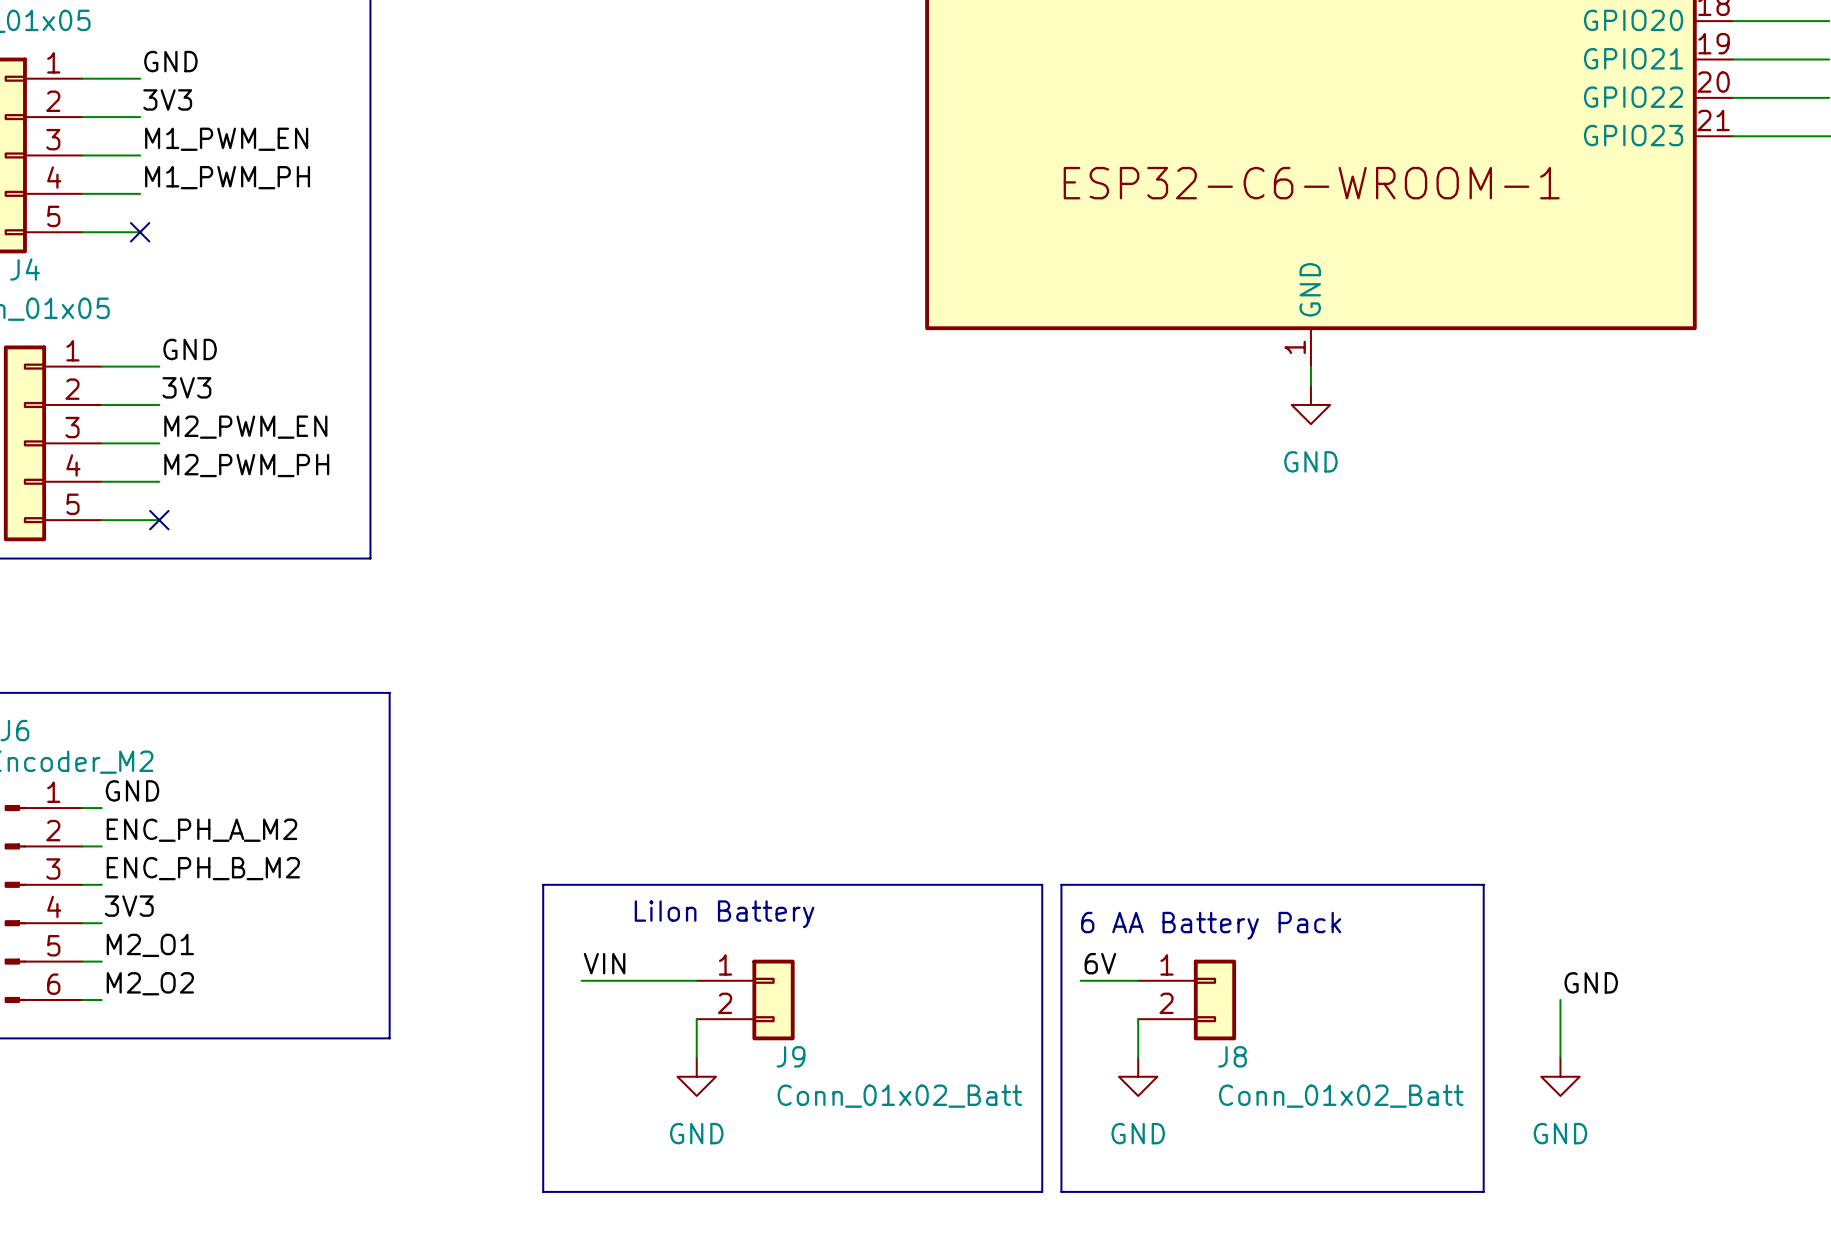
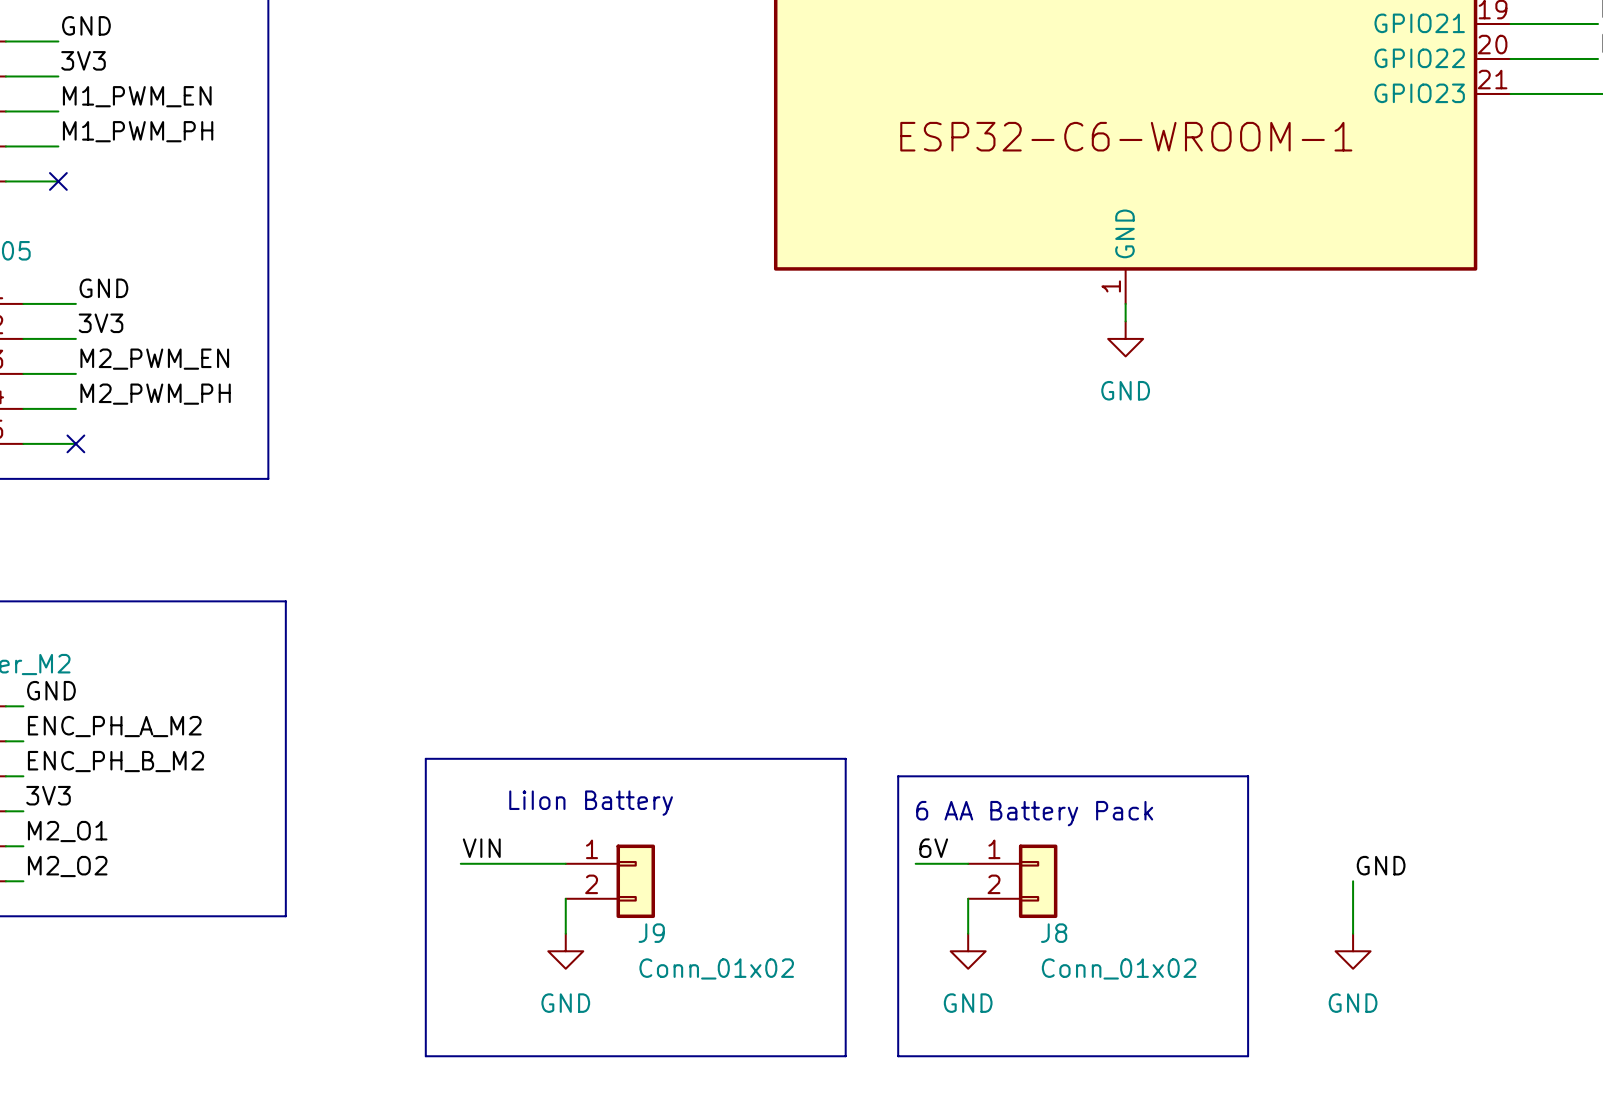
line: (543, 884) (1042, 884) (1042, 1191) (1003, 1191) -> (425, 776) (425, 758) (845, 758) (845, 1056)
line: (1445, 884) (1483, 884) (1483, 1191) (1445, 1191) -> (1248, 776) (1248, 1056)
J9 value: Conn_01x02_Batt (899, 1096) -> Conn_01x02 (716, 968)
J8 value: Conn_01x02_Batt (1341, 1096) -> Conn_01x02 (1119, 968)

